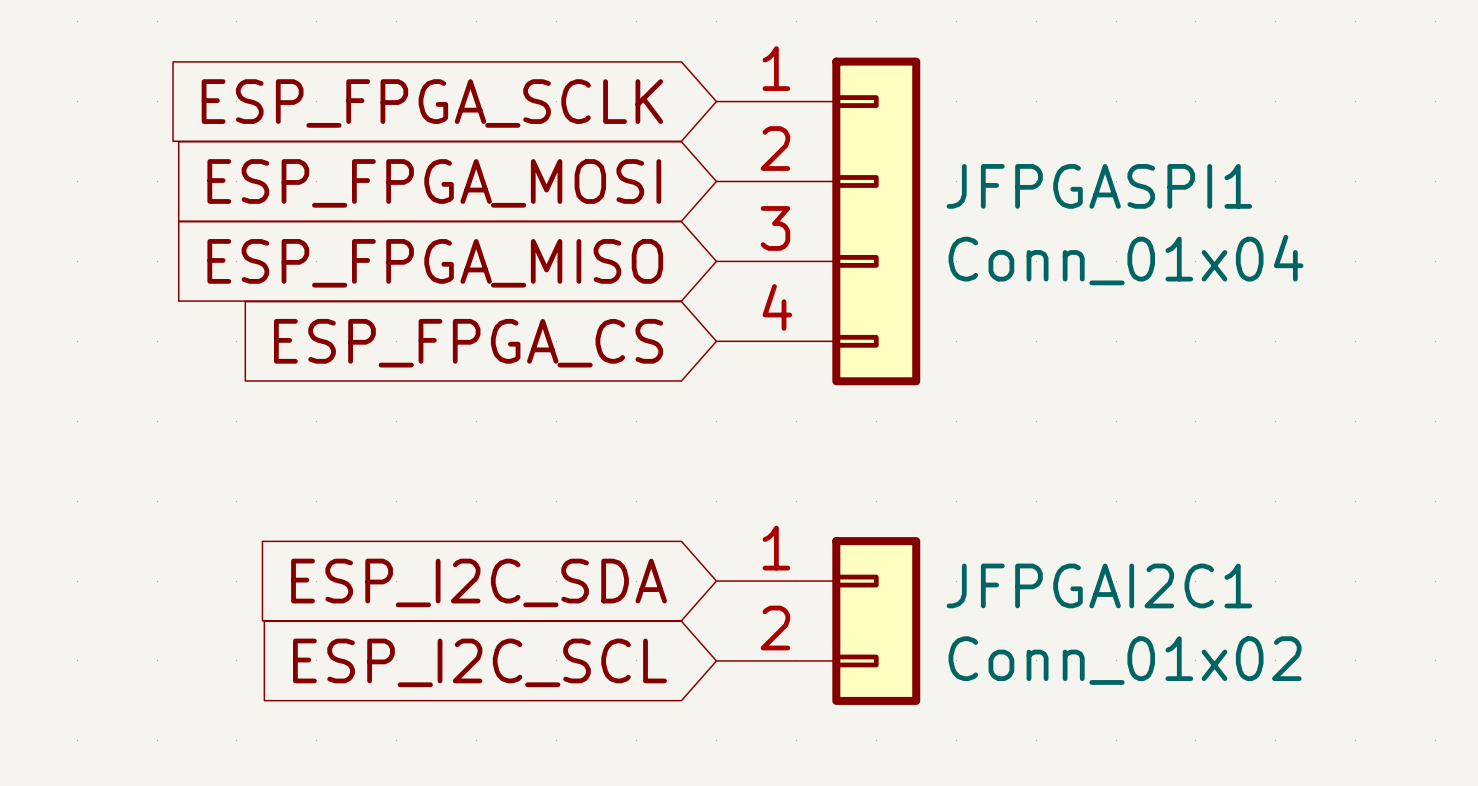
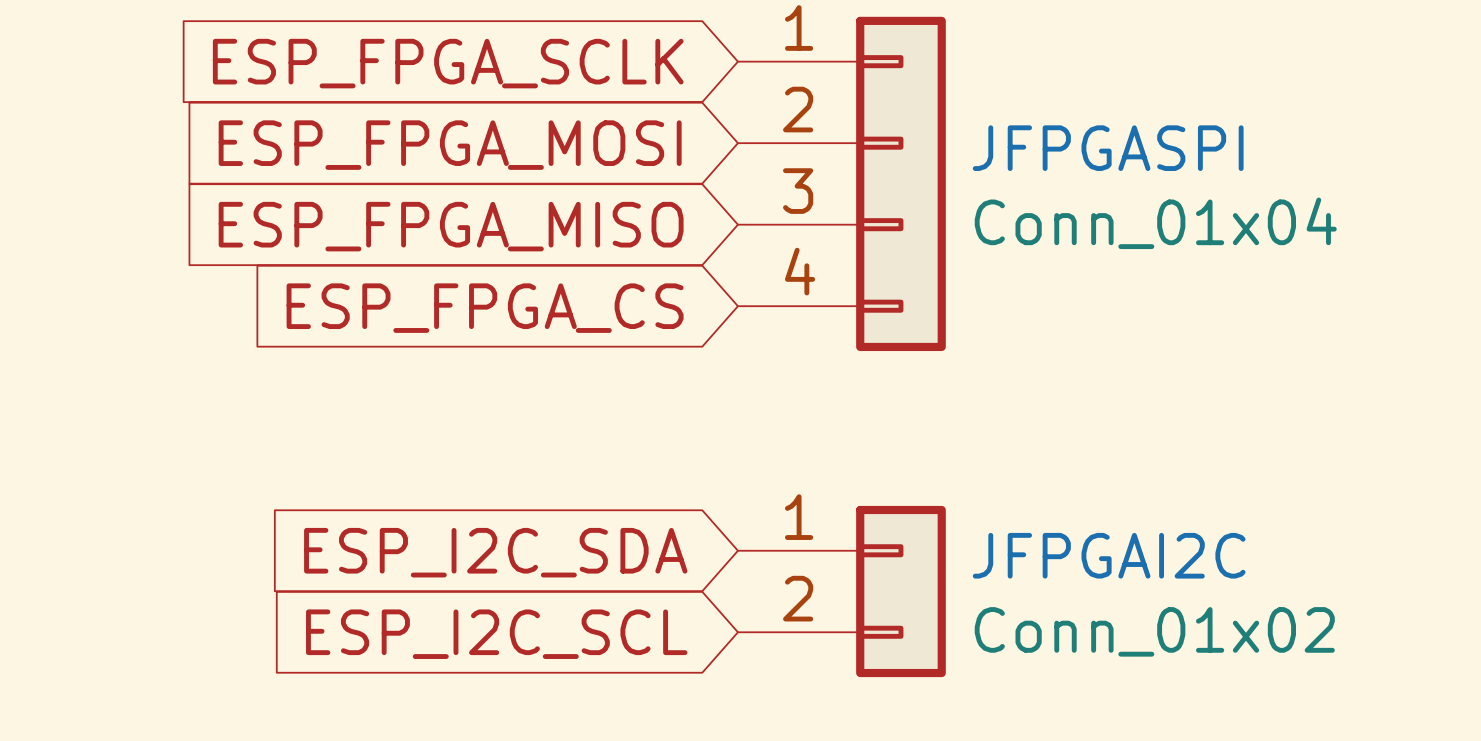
JFPGASPI1 name: JFPGASPI1 (1099, 186) -> JFPGASPI (1108, 148)
JFPGAI2C1 name: JFPGAI2C1 (1099, 585) -> JFPGAI2C (1109, 555)

